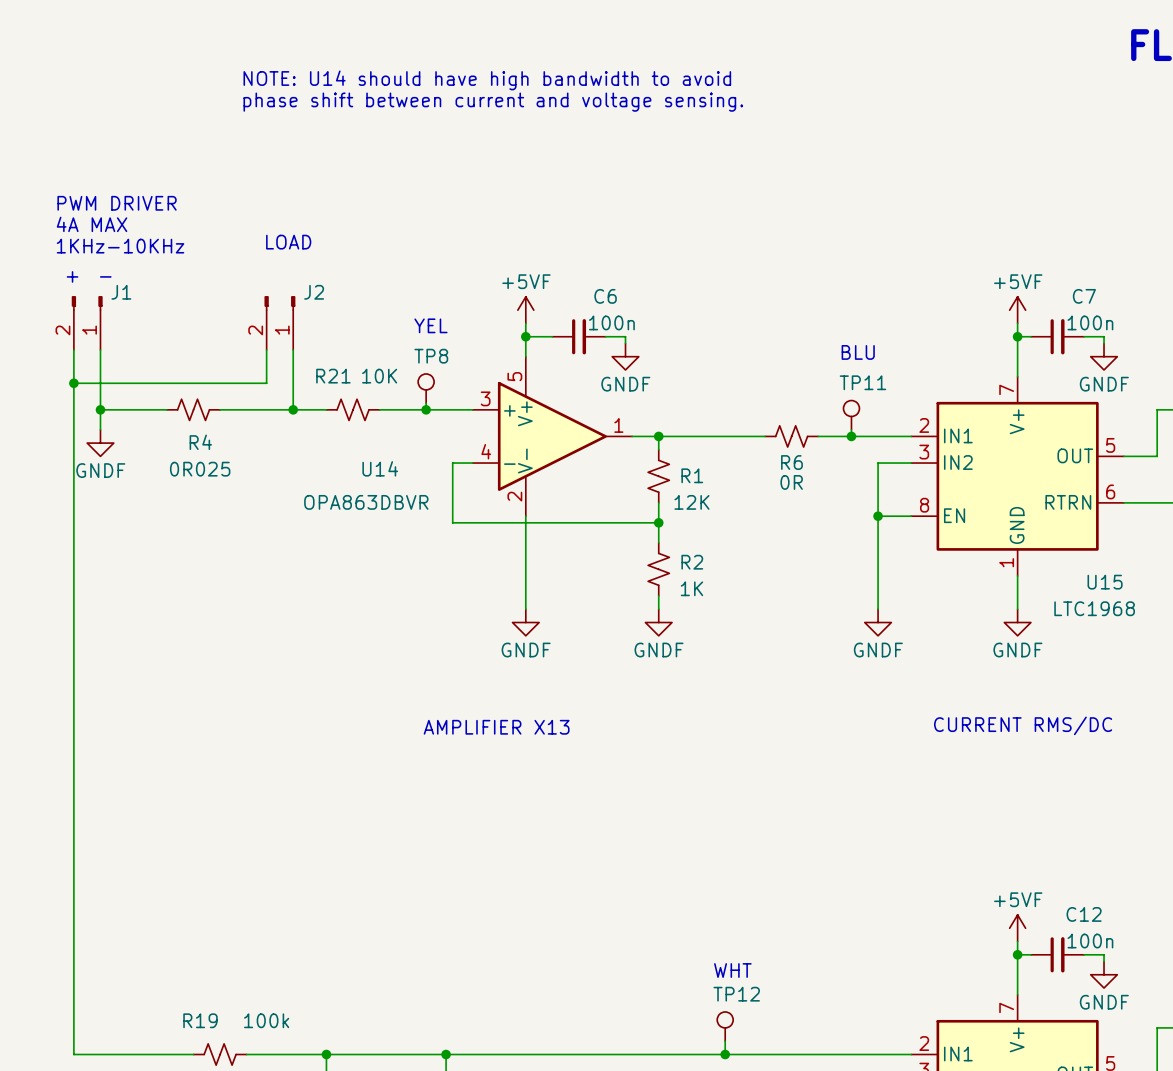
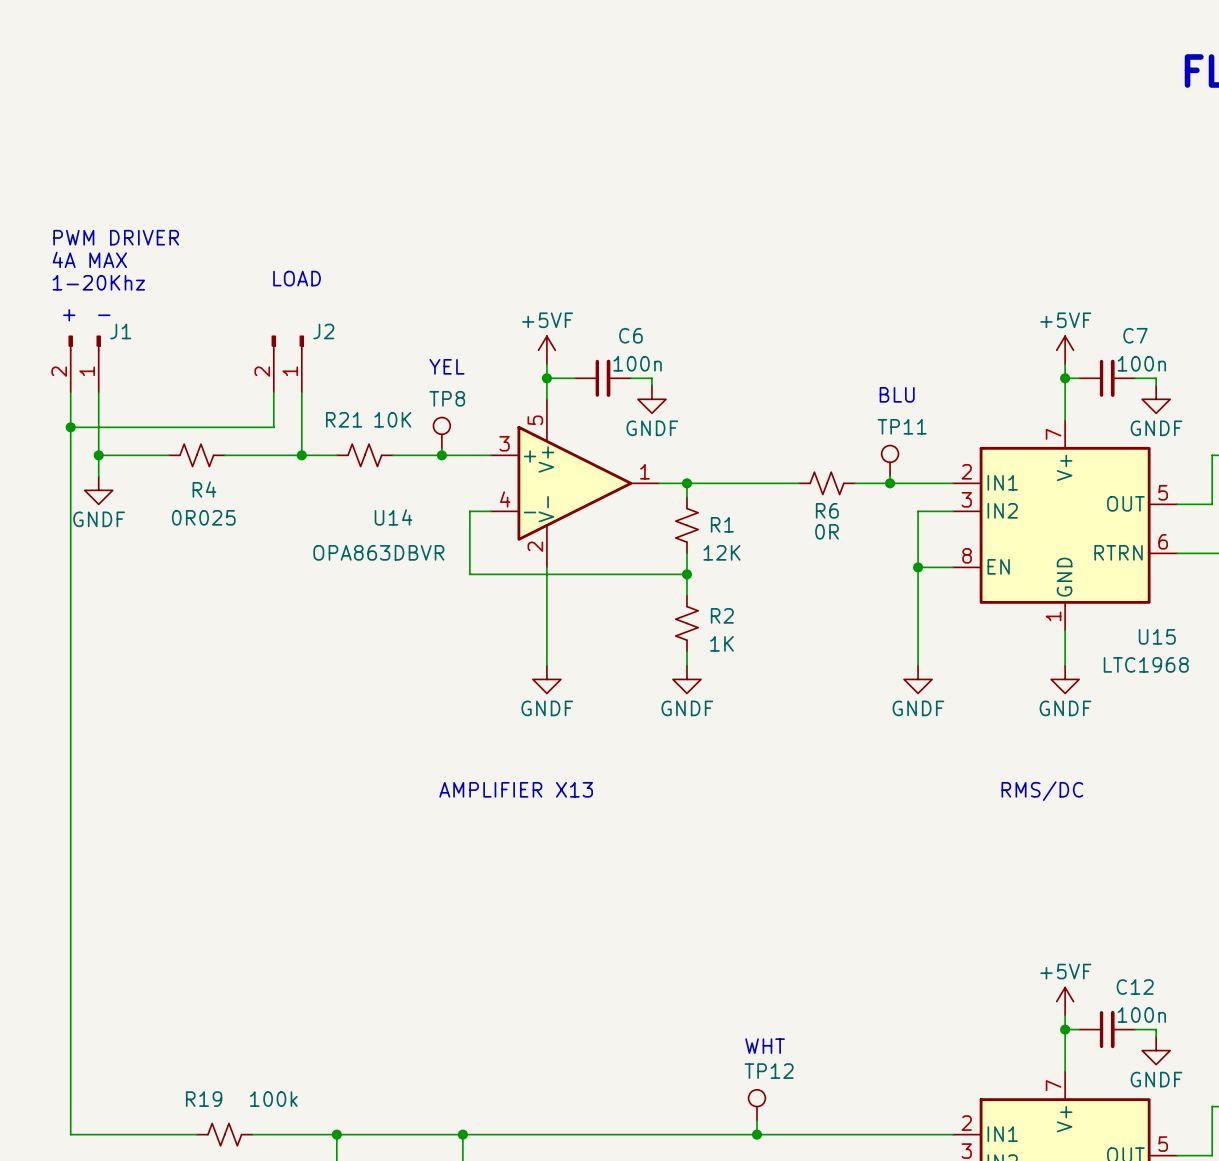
text: NOTE: U14 should have high bandwidth to avoid (487, 80) -> none
text: phase shift between current and voltage sensing. (493, 102) -> none
text: 1KHz-10KHz (120, 246) -> 1-20Khz (98, 282)
text: CURRENT RMS/DC (1023, 725) -> none
text: none -> RMS/DC (1042, 791)

